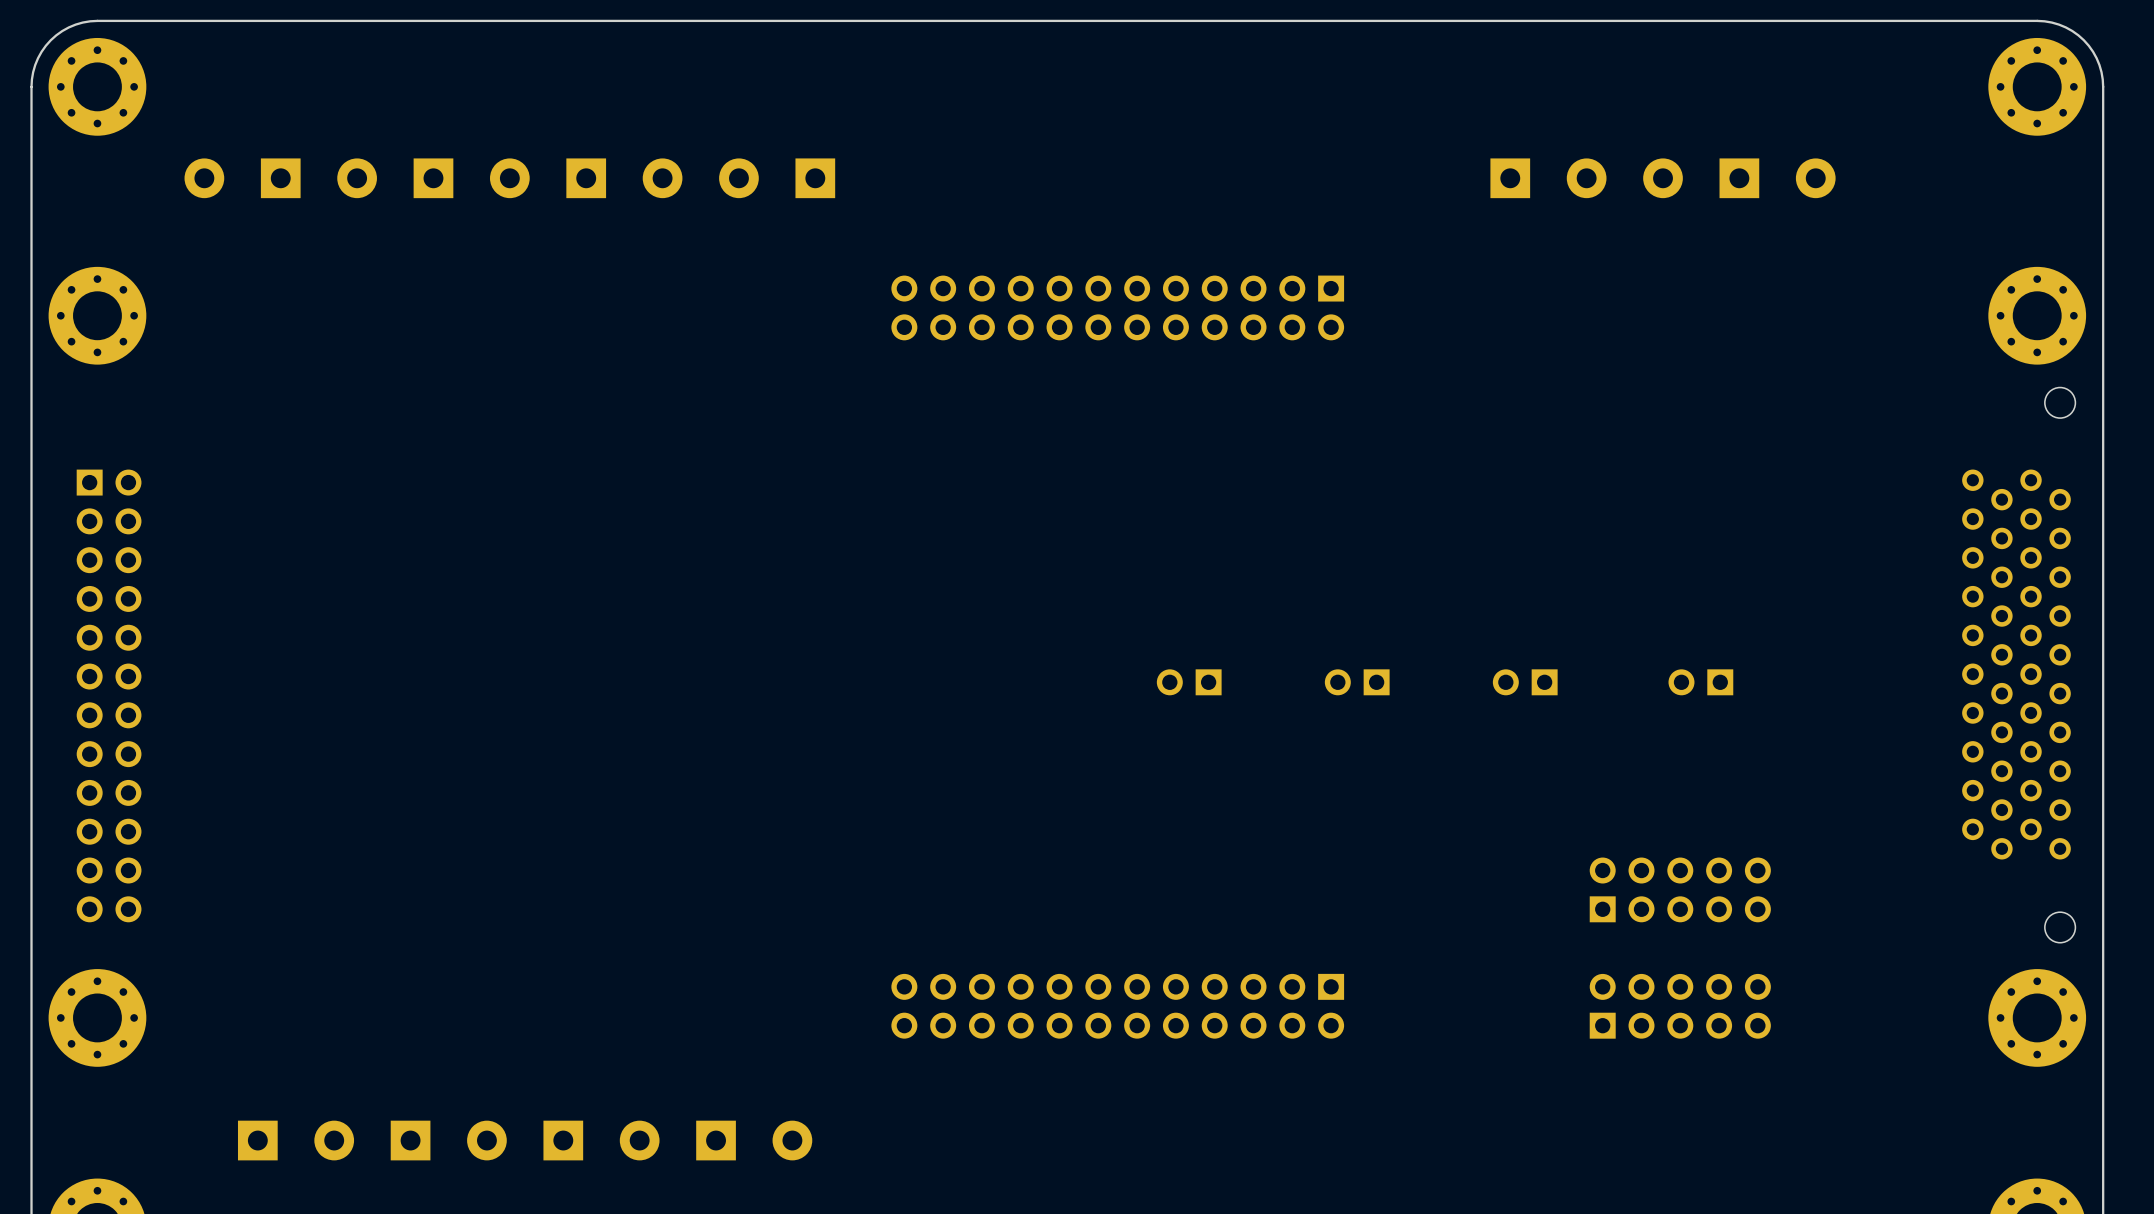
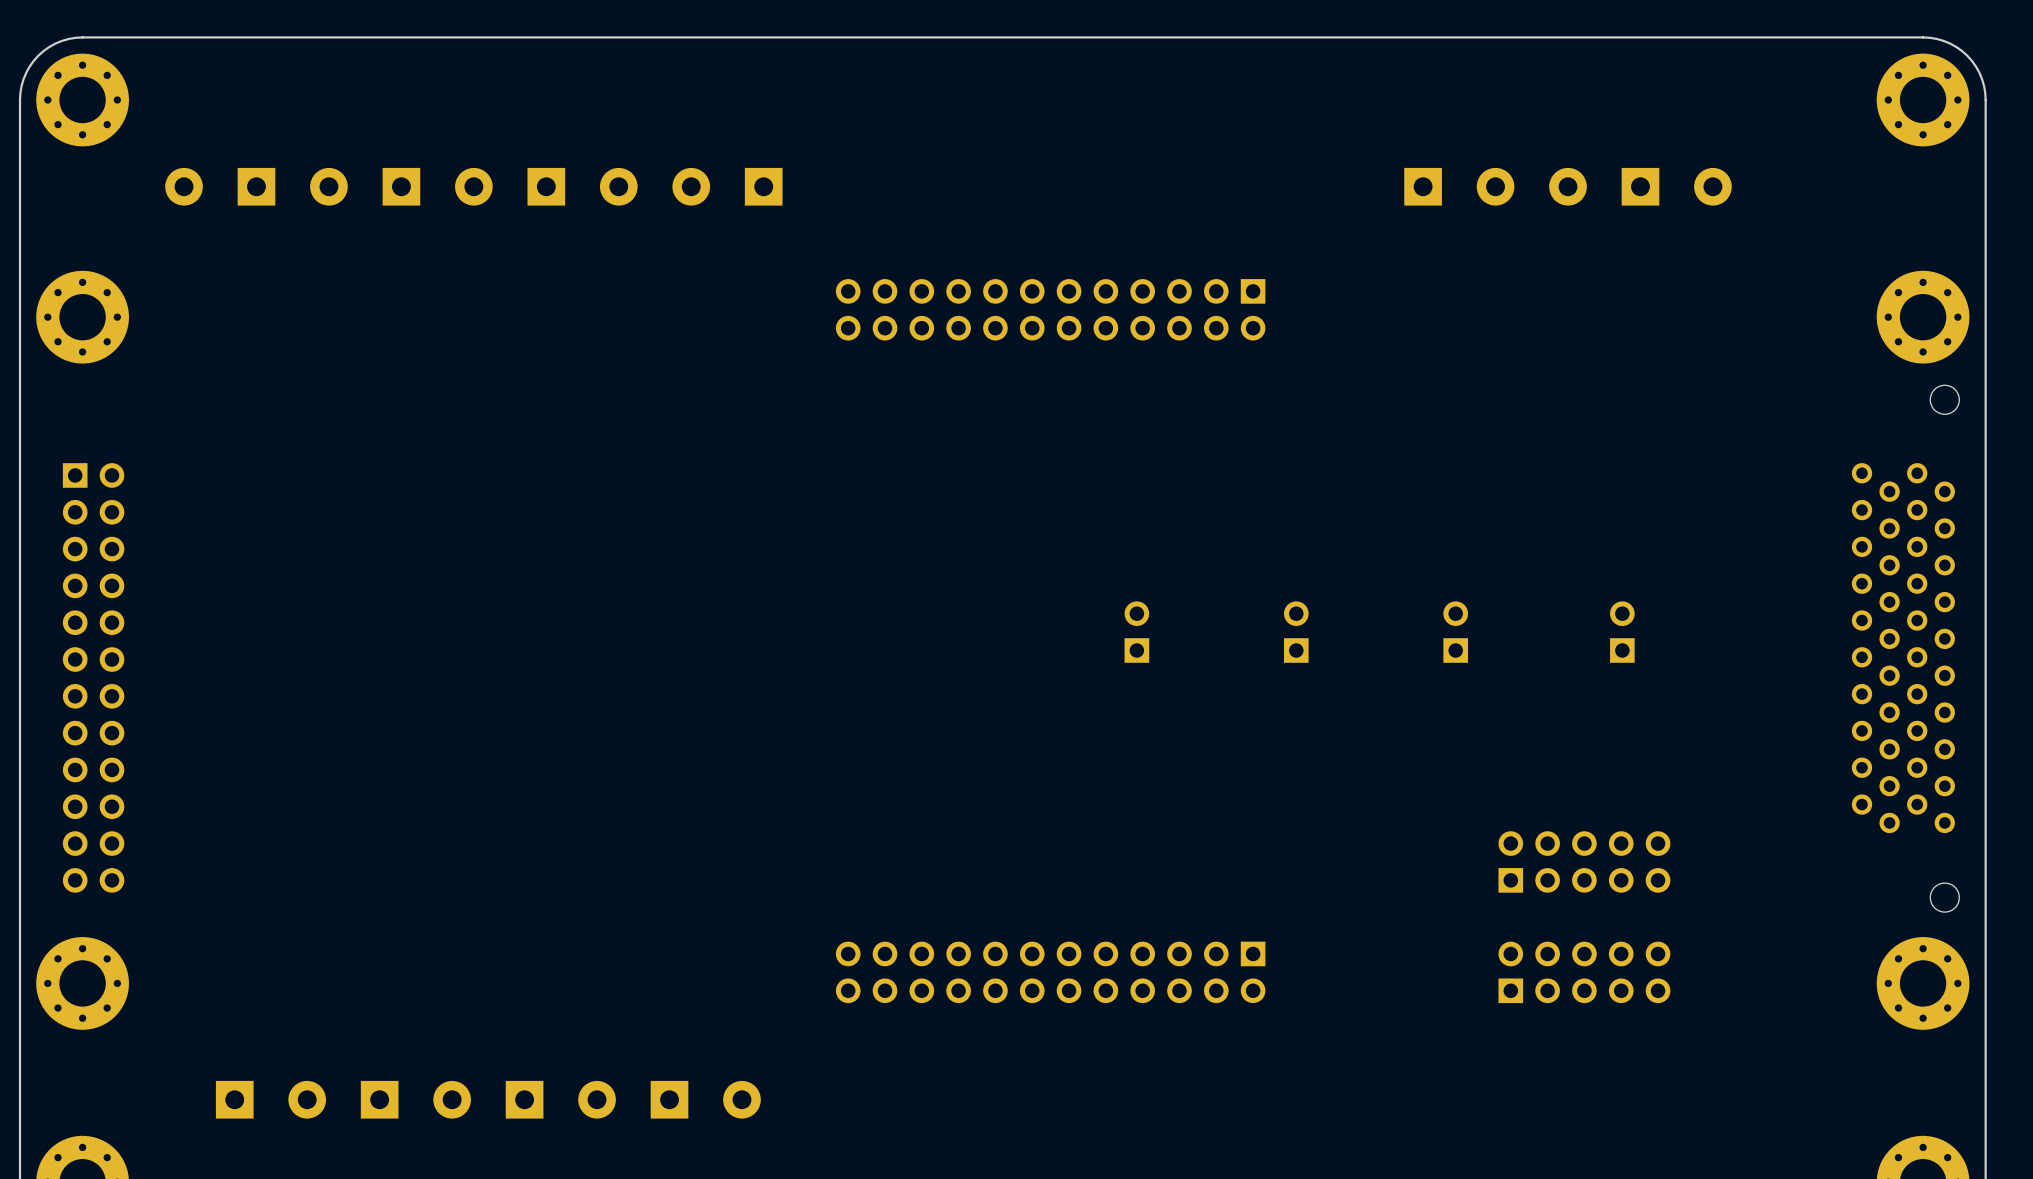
part rotation: 0° (1189, 682) -> 90° clockwise (1136, 632)
part position: (1189, 682) -> (1136, 632)
part rotation: 0° (1357, 682) -> 90° clockwise (1296, 632)
part position: (1357, 682) -> (1296, 632)
part rotation: 0° (1525, 682) -> 90° clockwise (1455, 632)
part position: (1525, 682) -> (1455, 632)
part rotation: 0° (1700, 682) -> 90° clockwise (1622, 632)
part position: (1700, 682) -> (1622, 632)

